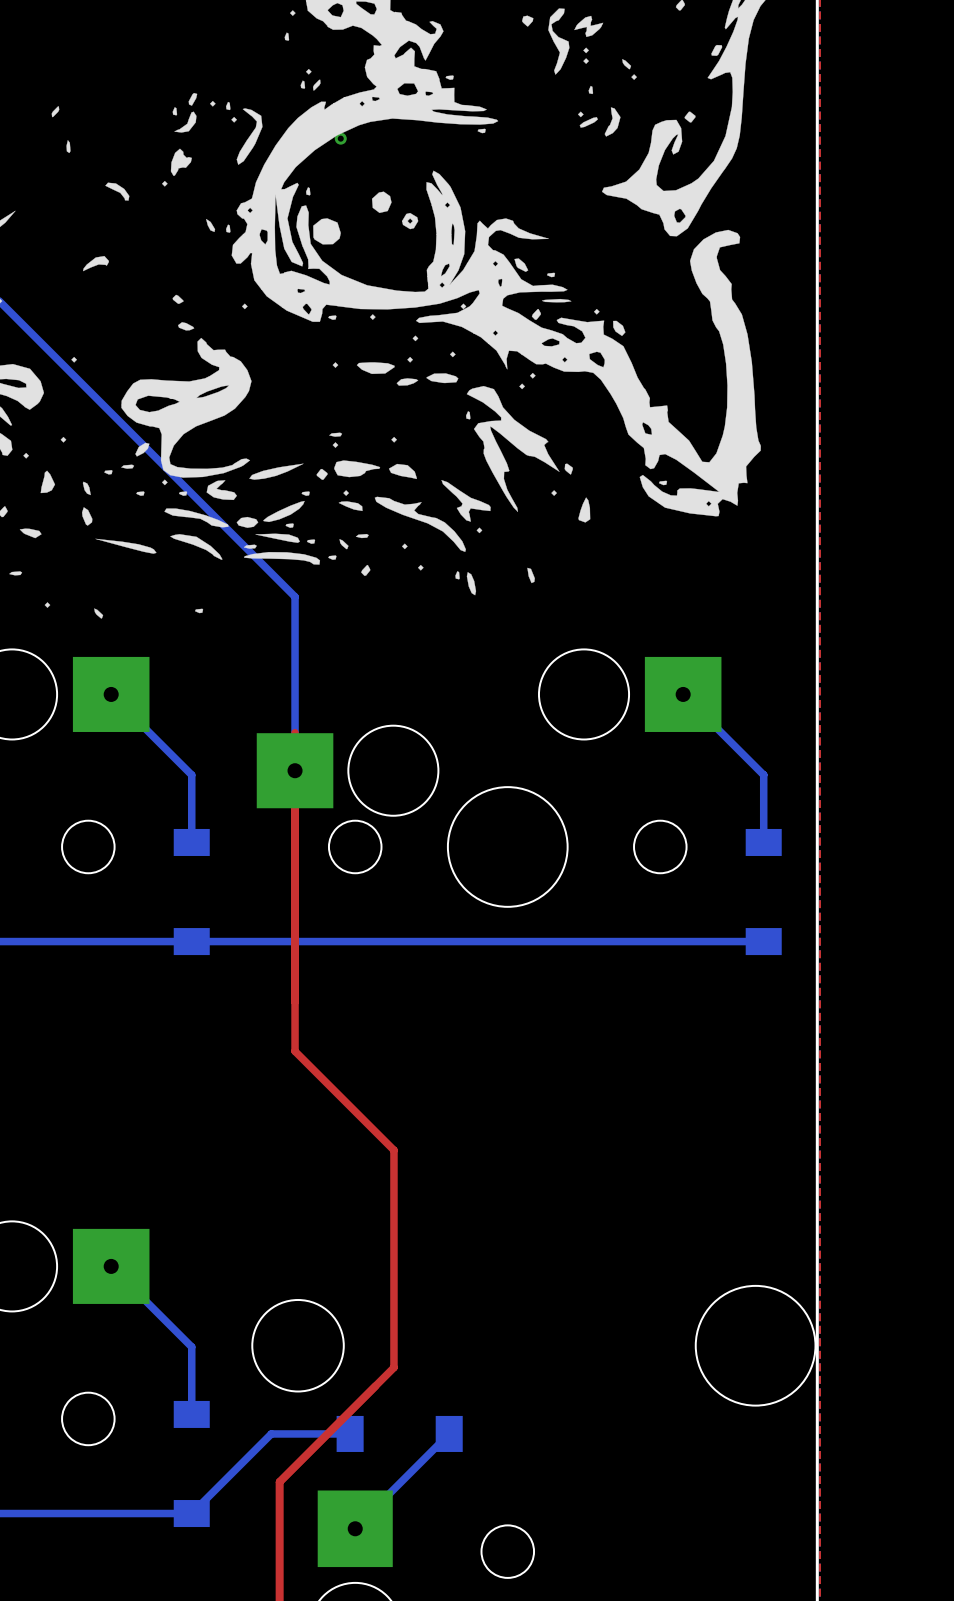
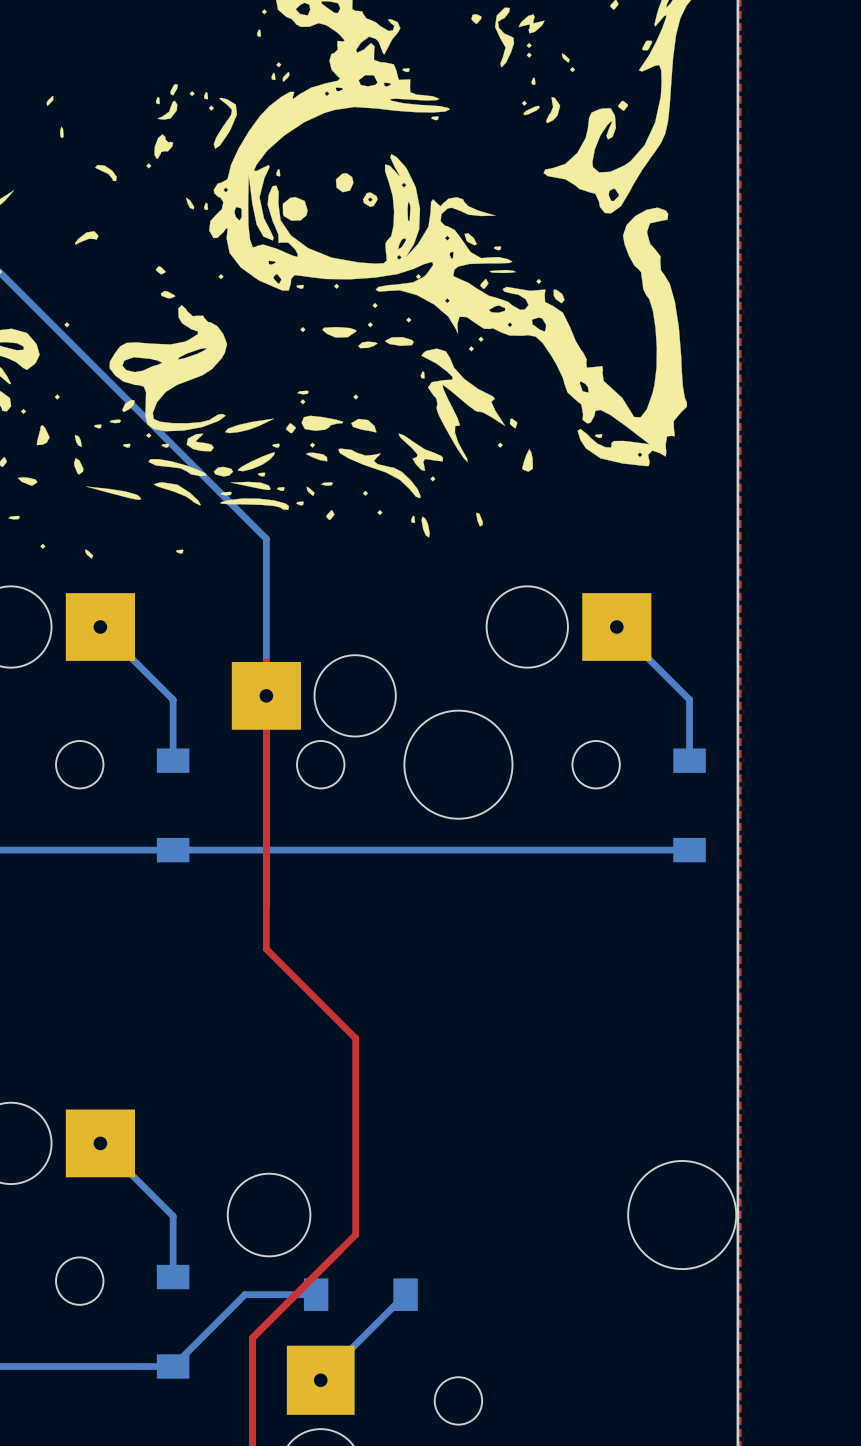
via: (340, 138) -> none

